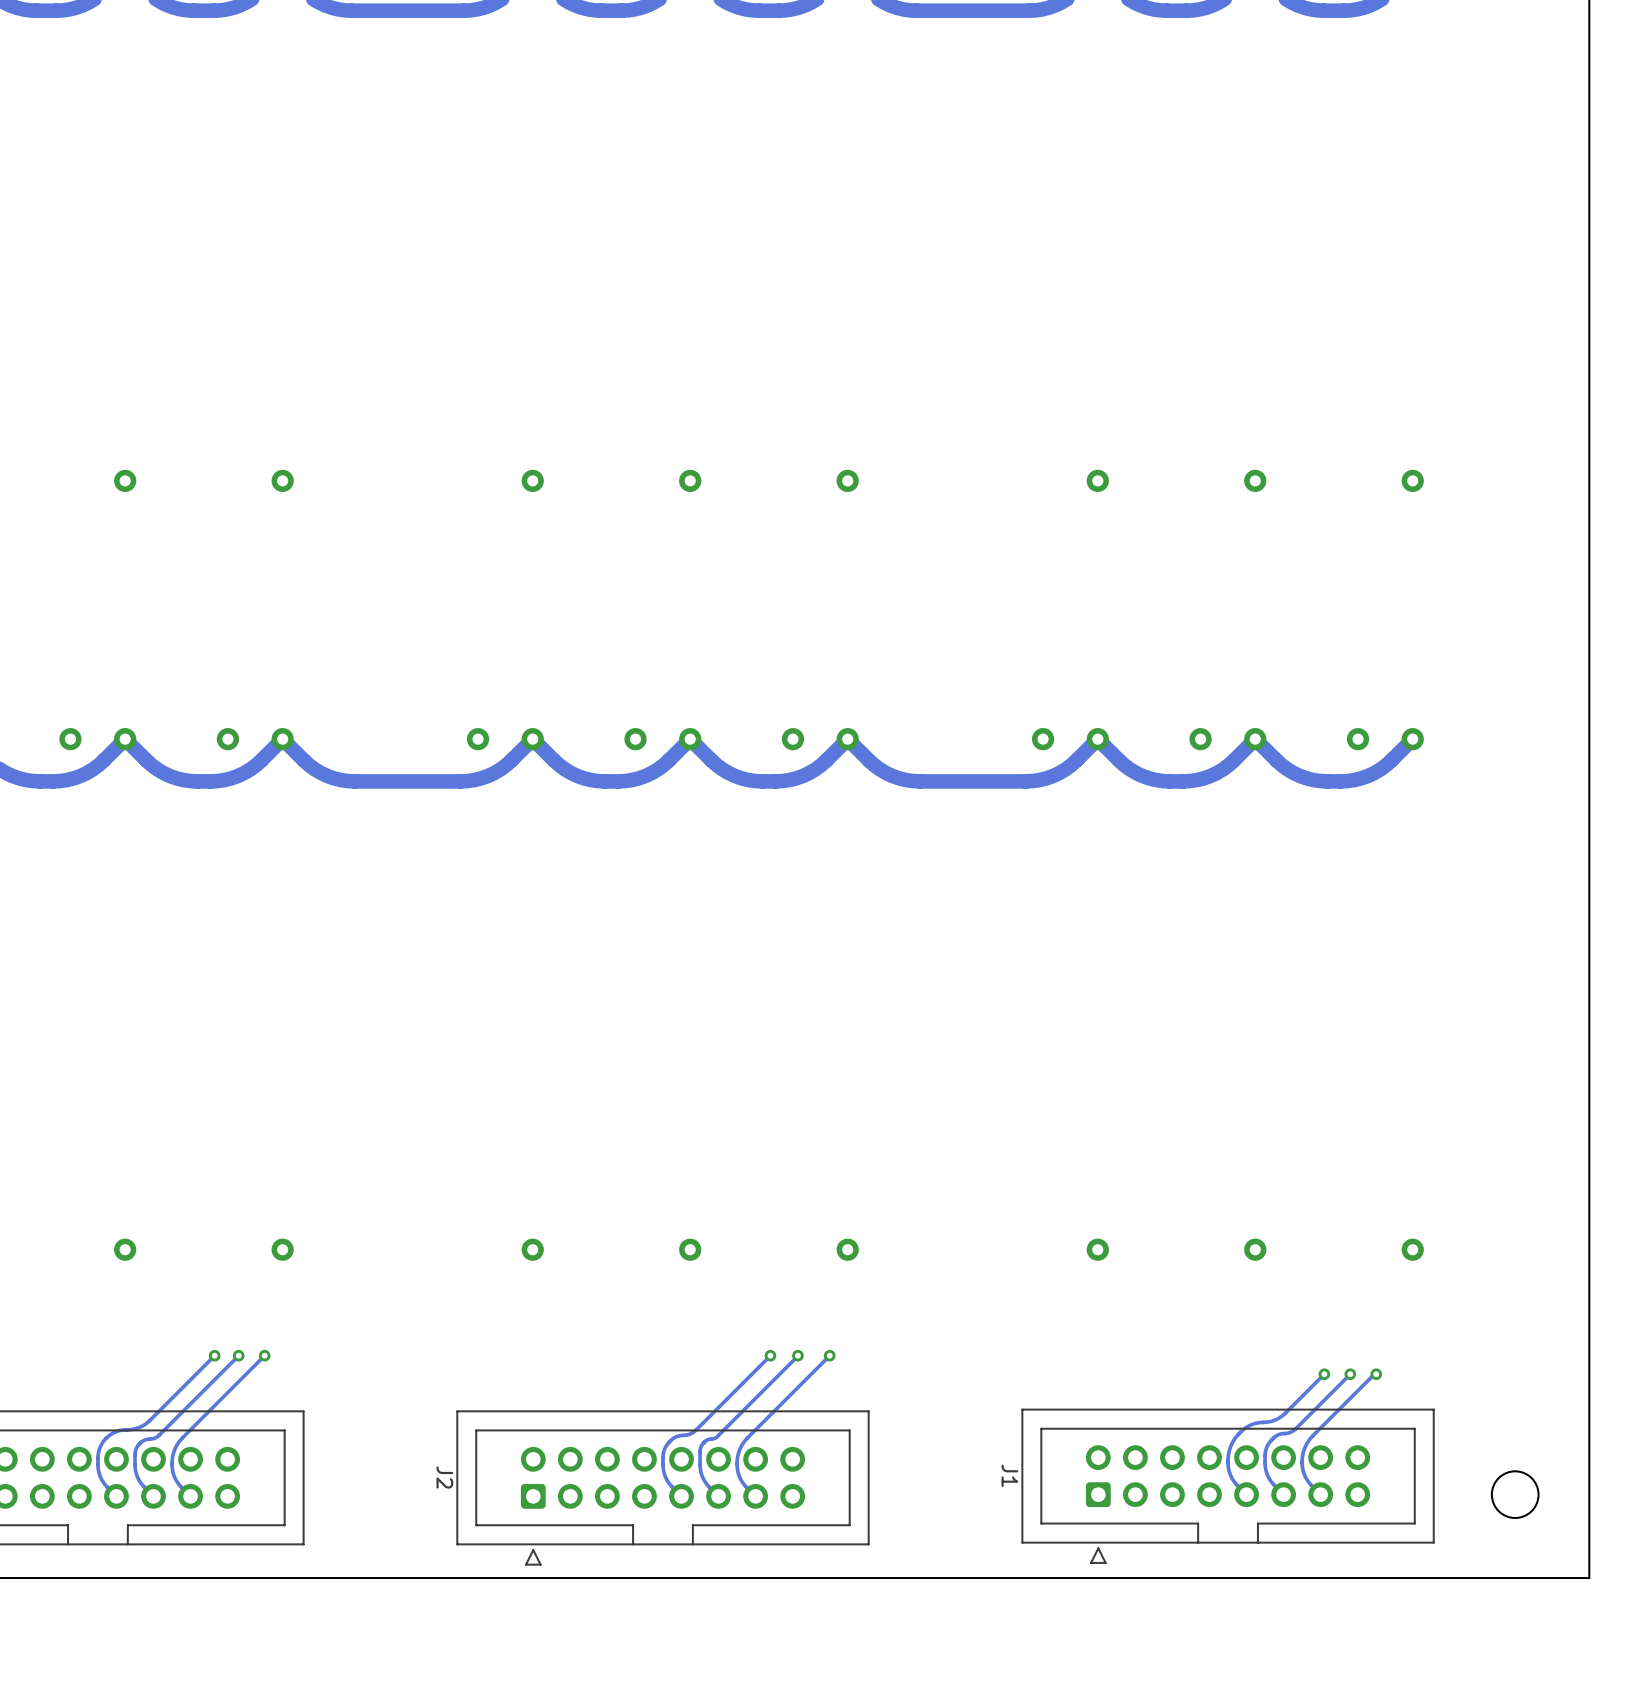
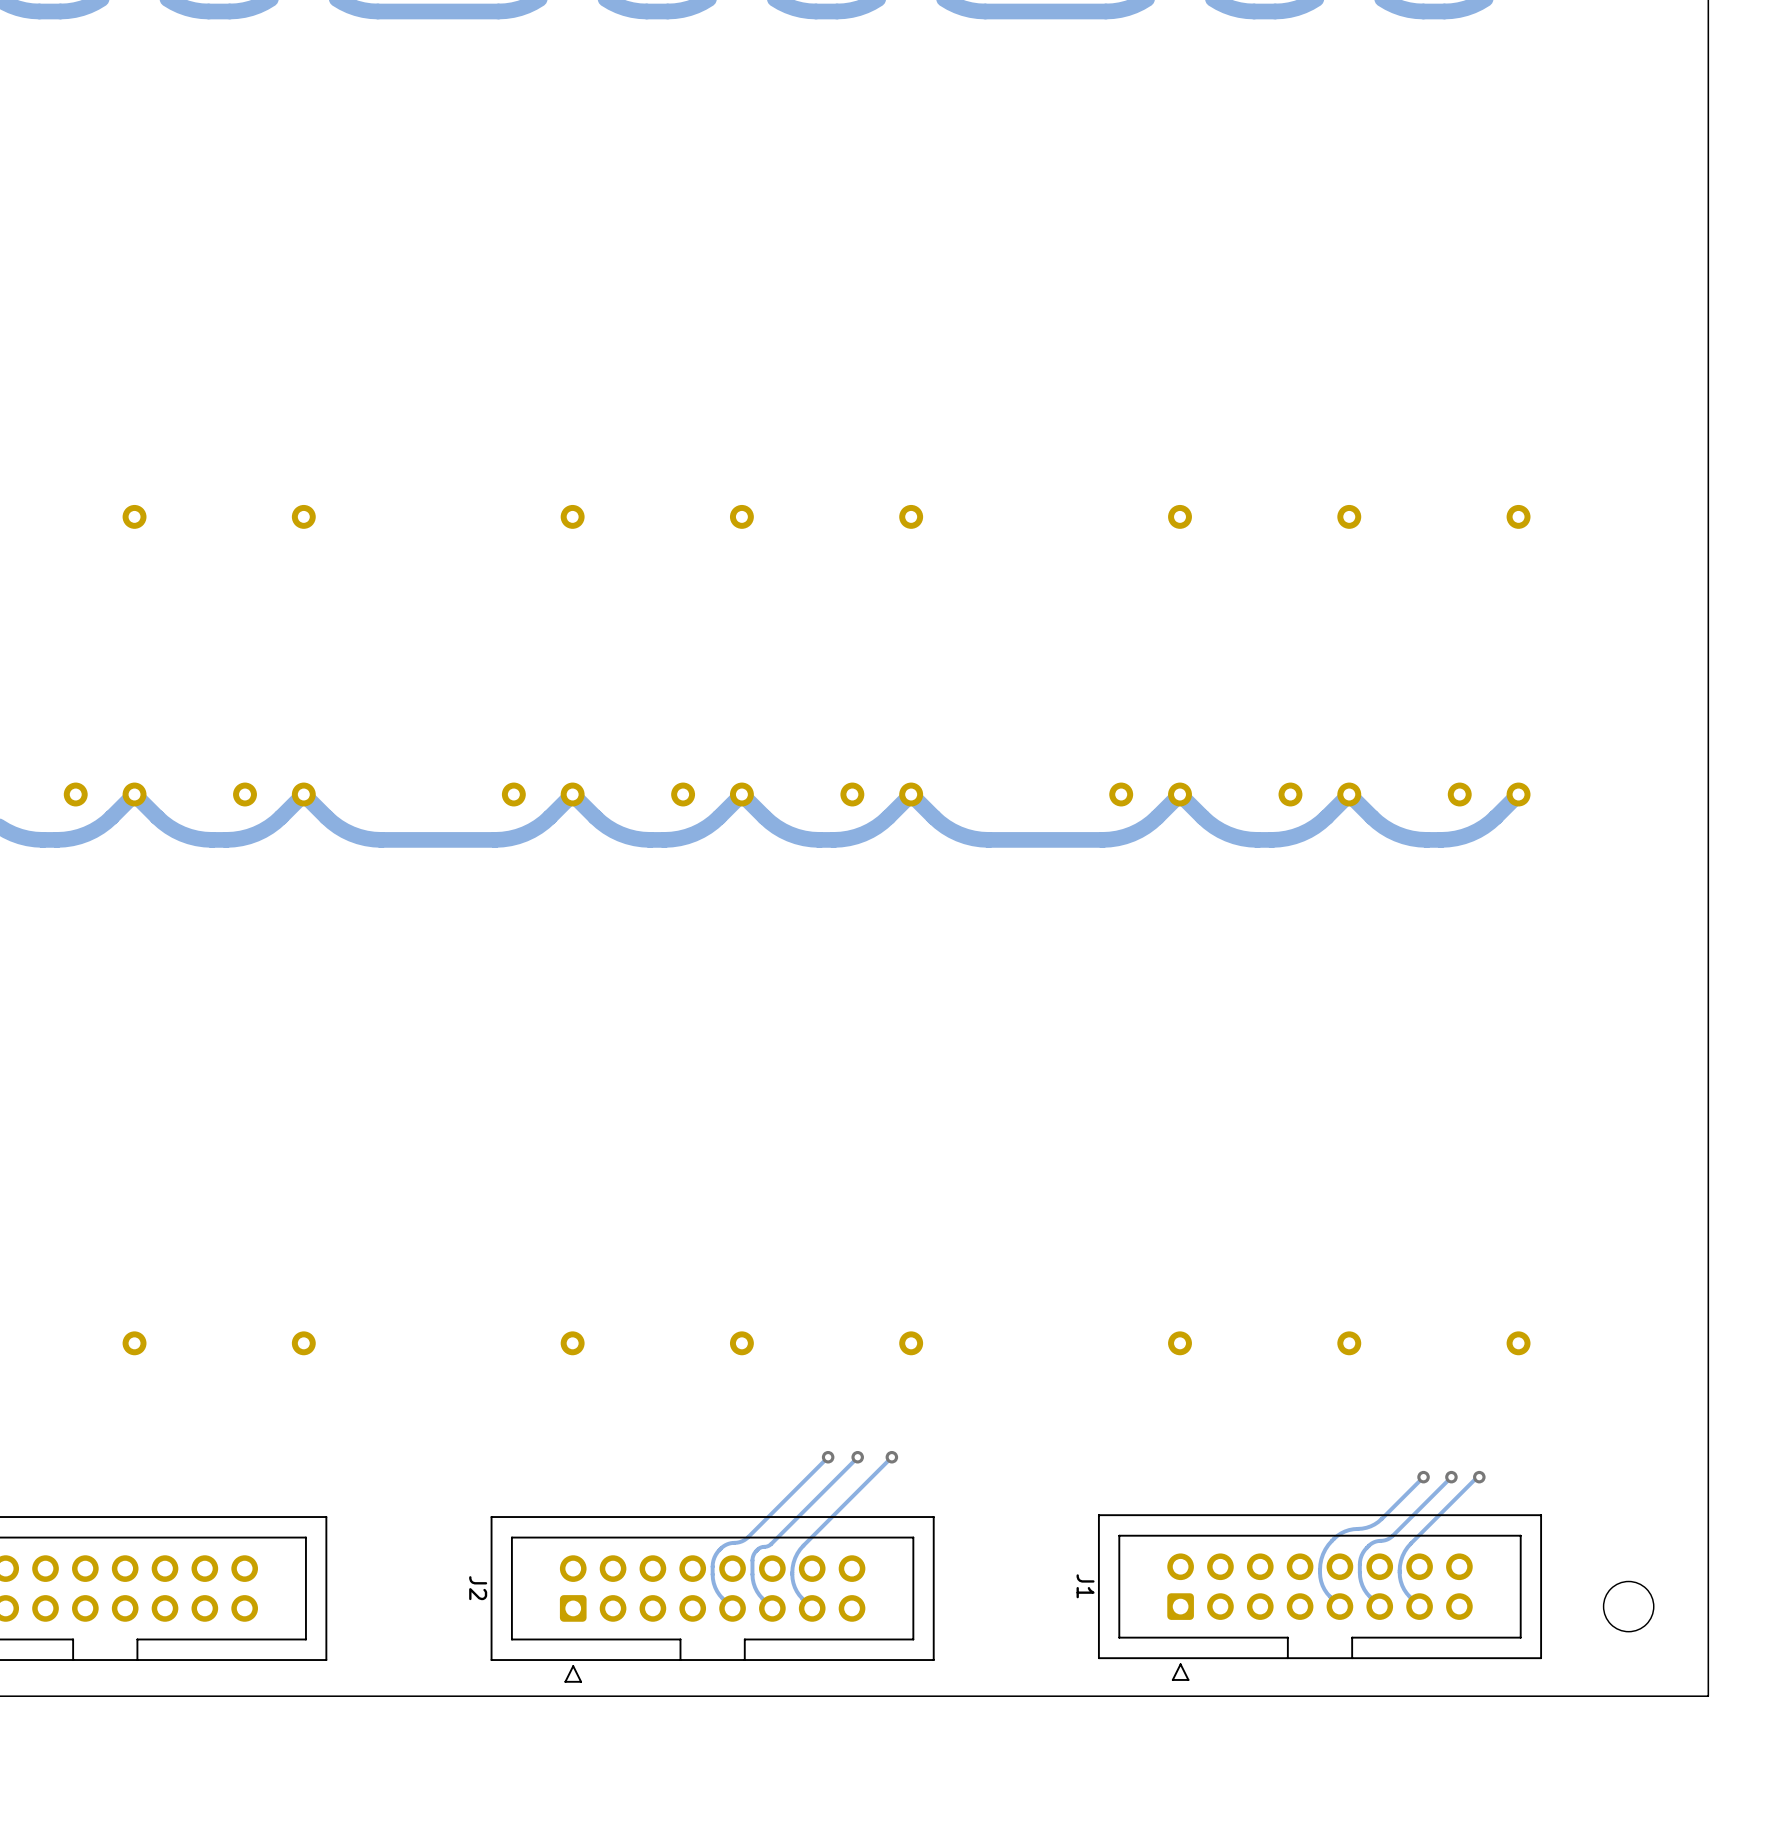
track: (214, 1355) (146, 1423) (135, 1428) (115, 1431) (103, 1440) (98, 1454) (99, 1472) (104, 1484) (116, 1496) -> none
via: (214, 1355) -> none
track: (238, 1355) (158, 1436) (143, 1440) (137, 1446) (134, 1454) (136, 1472) (141, 1484) (153, 1496) -> none
via: (238, 1355) -> none
track: (264, 1355) (176, 1445) (172, 1458) (173, 1472) (178, 1484) (190, 1496) -> none
via: (264, 1355) -> none

